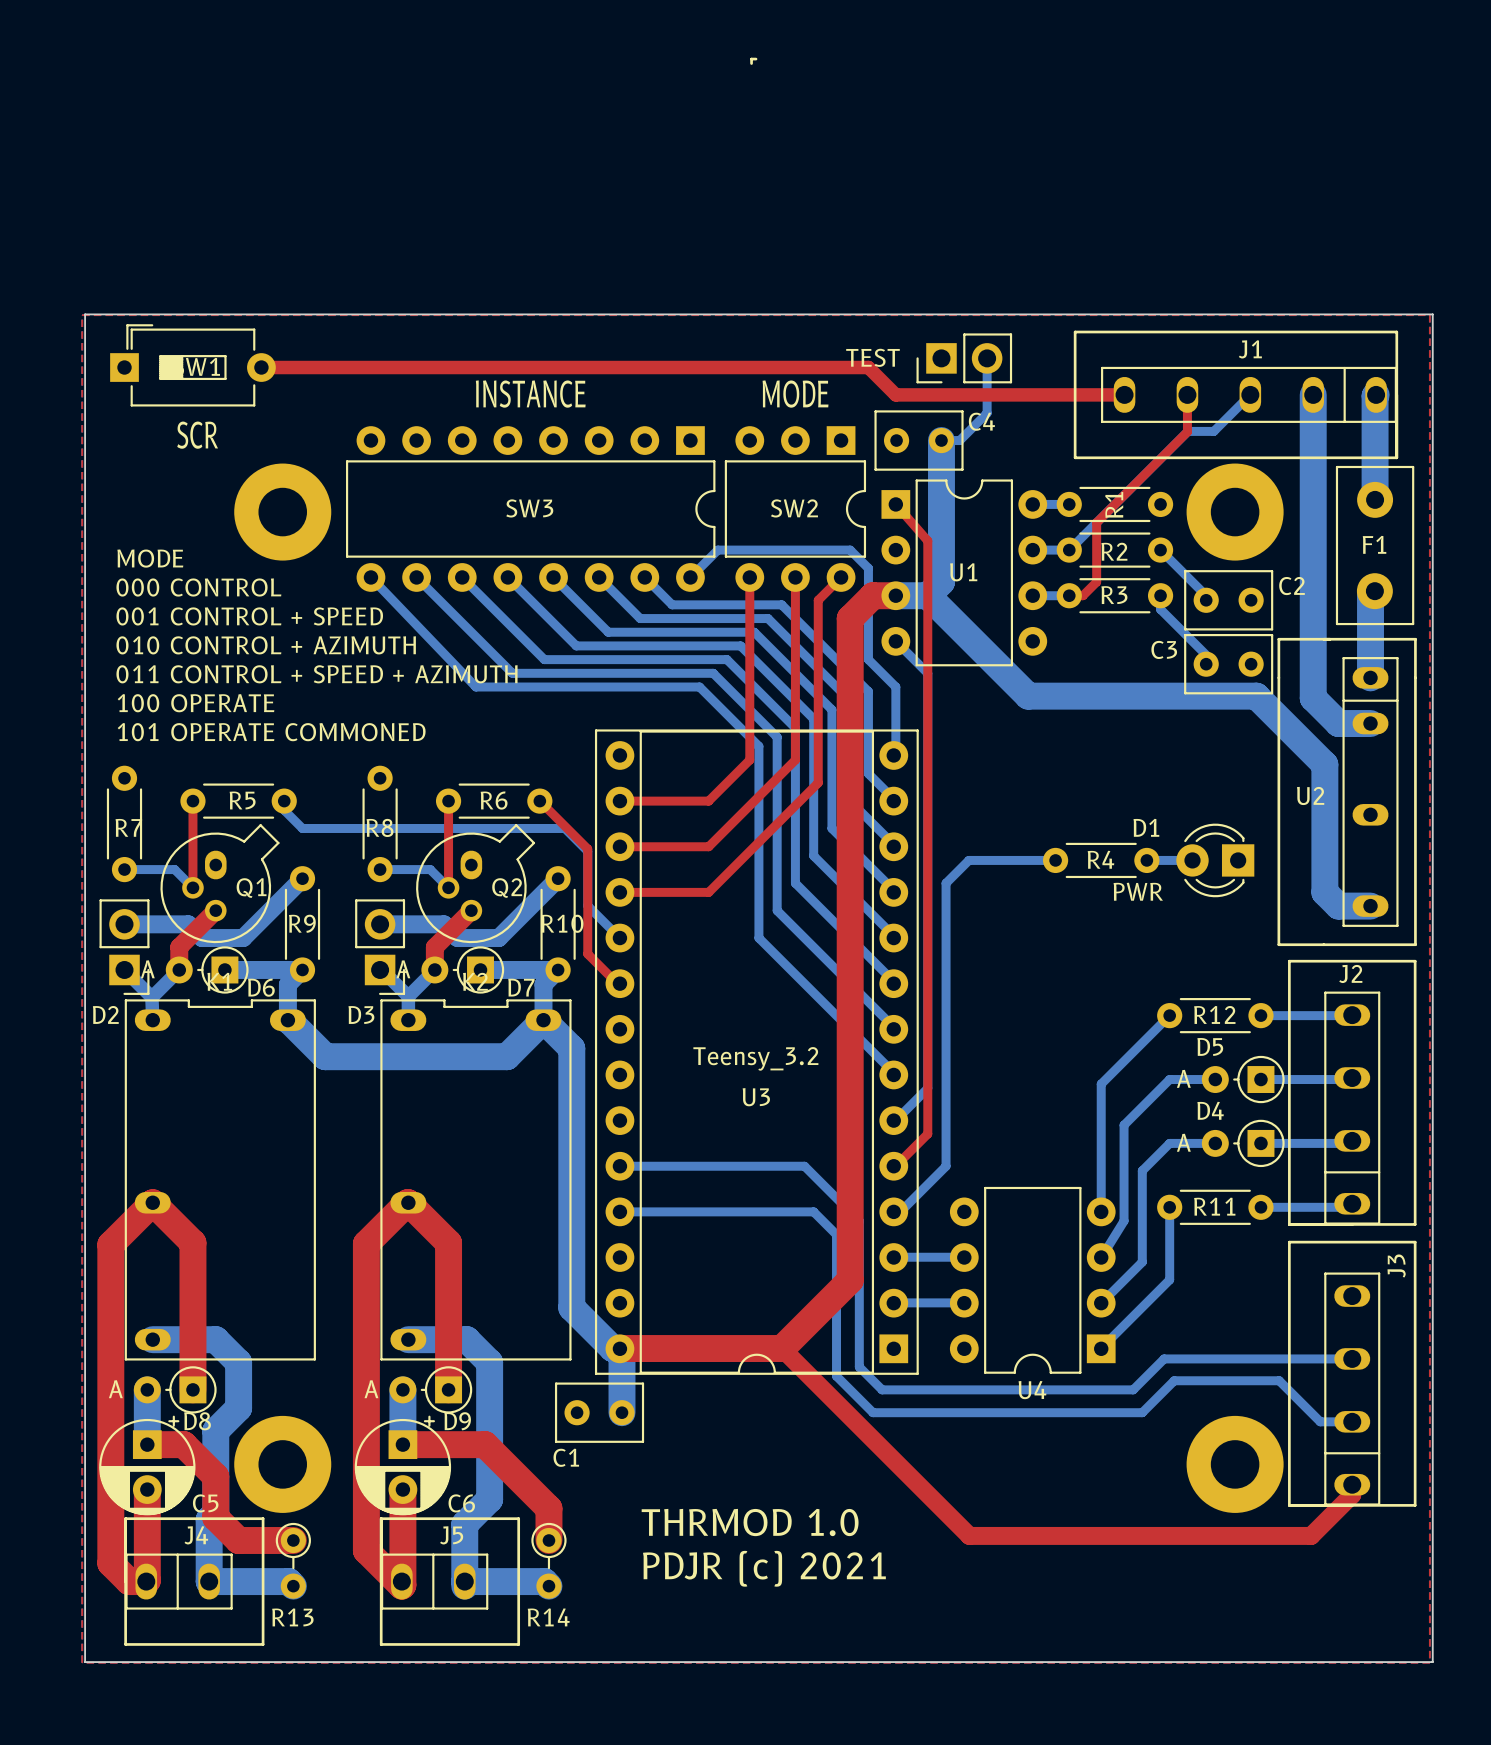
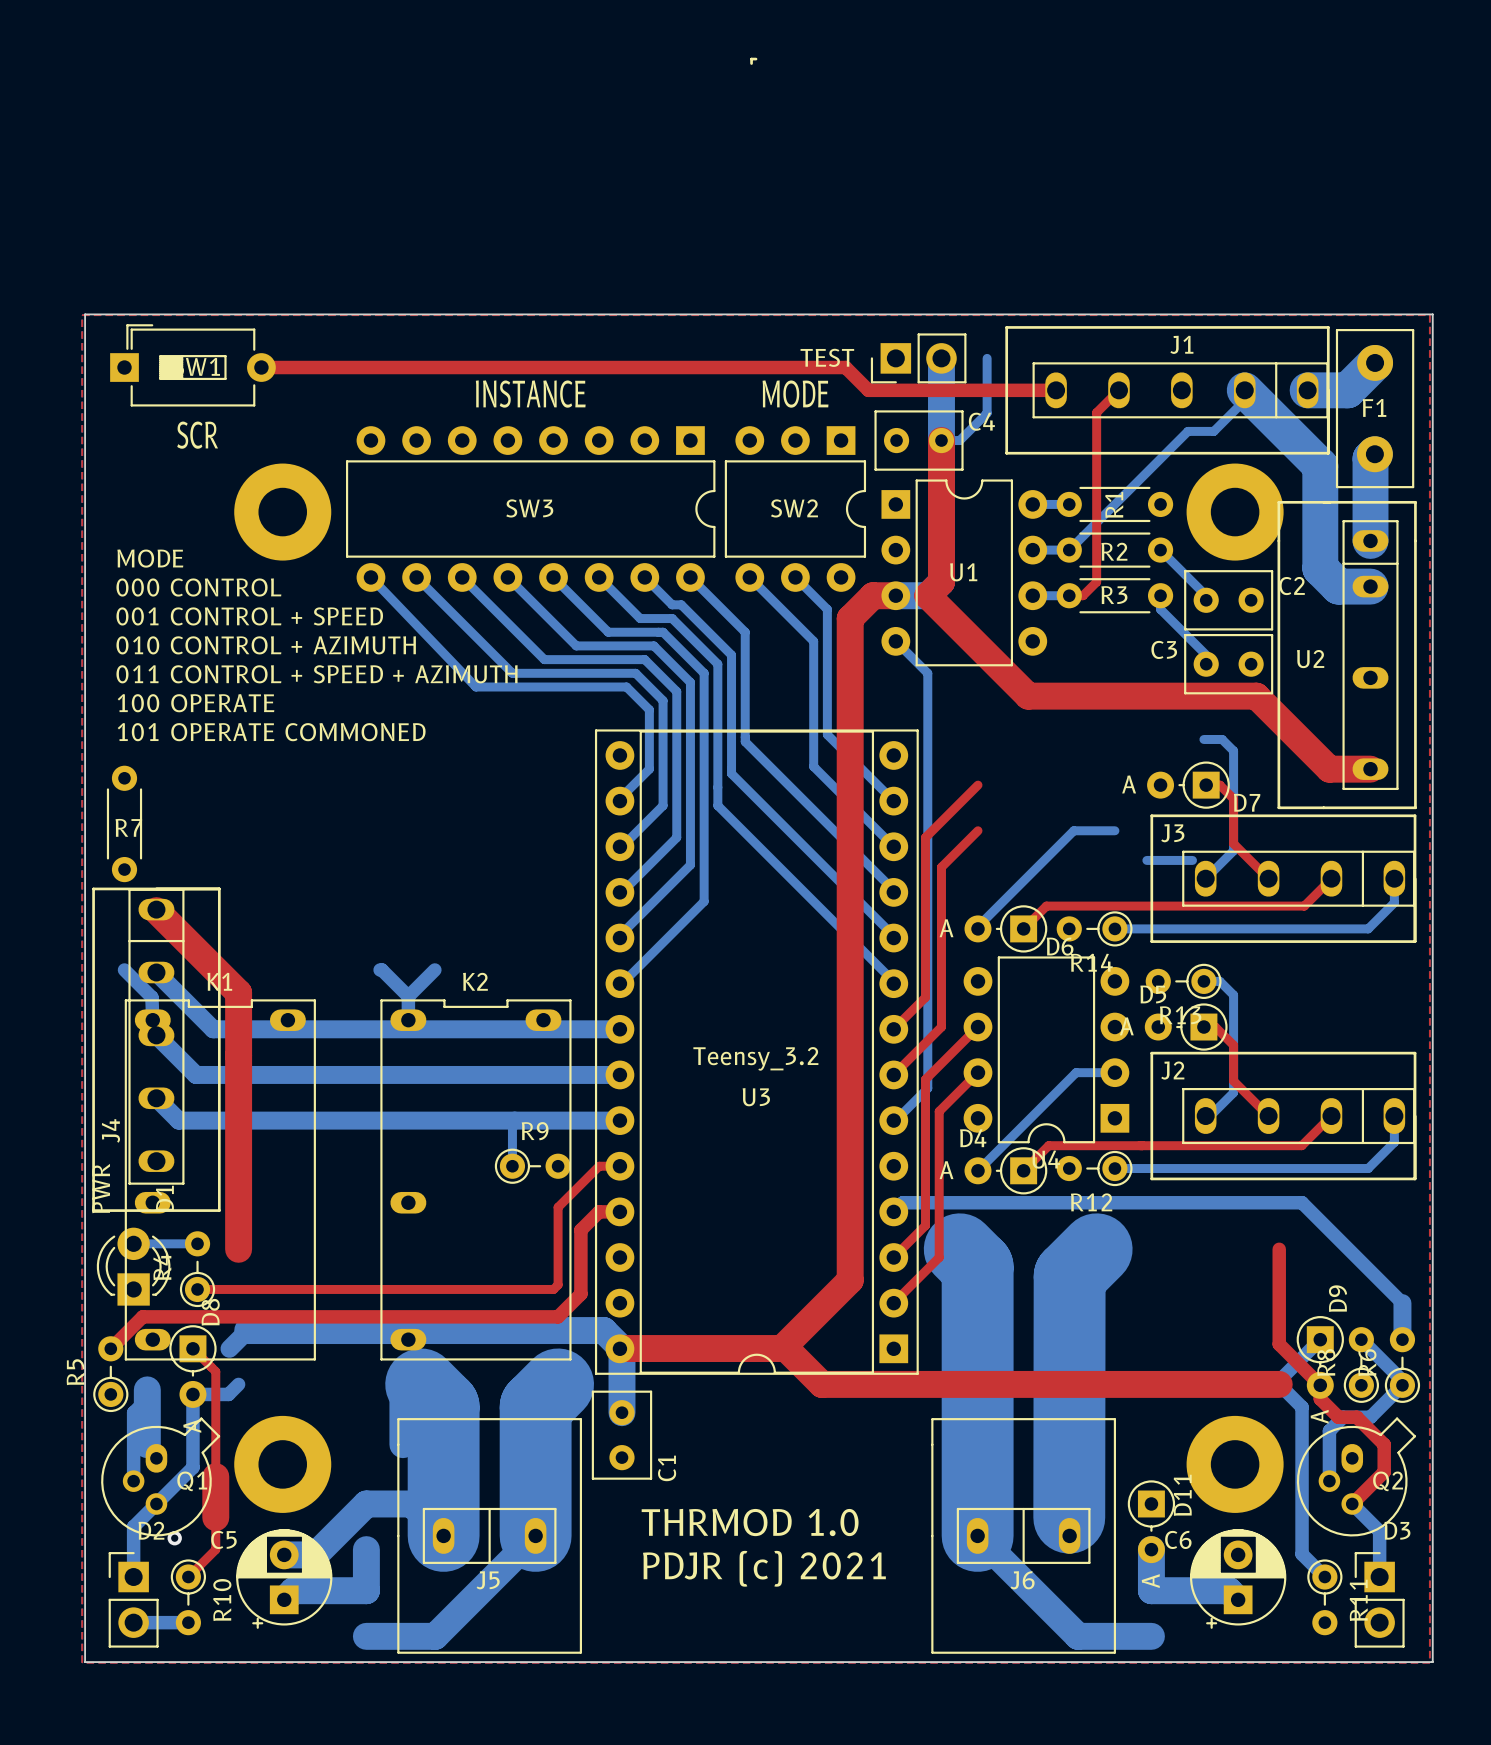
bottom track: none -> (941, 358) (941, 440)
TEST position: (964, 358) -> (918, 358)
bottom track: none -> (1375, 362) (1347, 390) (1307, 390)
top track: (845, 367) (868, 367) (895, 394) (1124, 394) -> (845, 367) (868, 390) (1056, 390)
bottom track: none -> (1244, 390) (1320, 465) (1320, 568) (1338, 586) (1370, 586)
top track: (1187, 394) (1187, 431) (1096, 522) -> (1118, 390) (1096, 412) (1096, 522)
J1 position: (1235, 394) -> (1167, 390)
bottom track: (1313, 394) (1313, 698) (1338, 723) (1370, 723) -> none
bottom track: (1376, 394) (1375, 499) -> none
top track: none -> (941, 440) (941, 582) (927, 595) (1028, 696) (1256, 696) (1329, 769) (1370, 769)
top track: (895, 504) (927, 540) (927, 1134) (895, 1165) -> none
F1 position: (1375, 545) -> (1375, 408)
bottom track: (690, 577) (717, 550) (850, 550) (868, 568) (868, 659) (895, 687) (895, 755) -> none
top track: (749, 577) (749, 760) (708, 801) (619, 801) -> none
bottom track: none -> (795, 577) (827, 609) (827, 734) (893, 801)
top track: (795, 577) (795, 760) (708, 846) (619, 846) -> none
top track: (841, 577) (818, 600) (818, 782) (708, 892) (619, 892) -> none
bottom track: (1374, 591) (1370, 595) (1370, 677) -> (1374, 454) (1370, 458) (1370, 540)
bottom track: (927, 595) (1028, 696) (1256, 696) (1324, 764) (1324, 892) (1338, 906) (1370, 906) -> none
bottom track: (681, 604) (781, 604) (868, 691) (868, 773) (895, 800) -> (681, 604) (731, 655) (731, 773) (813, 855)
bottom track: (672, 618) (768, 618) (850, 700) (850, 801) (895, 846) -> none
bottom track: (663, 632) (754, 632) (831, 709) (831, 828) -> (690, 577) (745, 632) (745, 741) (831, 828)
bottom track: none -> (663, 632) (704, 673) (704, 901) (619, 983)
bottom track: (653, 645) (740, 645) (813, 718) -> (749, 577) (813, 641) (813, 718)
bottom track: (644, 659) (726, 659) (795, 728) (795, 883) -> (672, 618) (717, 664) (717, 805) (795, 883)
bottom track: none -> (644, 659) (676, 691) (676, 837) (619, 892)
bottom track: (635, 673) (713, 673) (777, 737) (777, 910) (895, 1029) -> (635, 673) (663, 700) (663, 805) (619, 846)
bottom track: (626, 687) (699, 687) (758, 746) (758, 938) (895, 1074) -> (626, 687) (649, 709) (649, 769) (619, 798) (619, 801)
bottom track: none -> (1203, 739) (1222, 739) (1233, 750) (1233, 850) (1205, 878)
R8 footprint: [362, 765, 398, 883] -> [1343, 1327, 1379, 1403]
bottom track: (813, 766) (813, 855) -> (813, 766) (893, 846)
R5 footprint: [180, 783, 297, 819] -> [93, 1336, 129, 1413]
R6 footprint: [435, 783, 553, 819] -> [1384, 1327, 1421, 1403]
top track: none -> (977, 785) (925, 837) (925, 997) (893, 1029)
top track: none -> (1206, 785) (1219, 785) (1233, 798) (1233, 843) (1268, 878)
U2 position: (1347, 791) -> (1347, 655)
R5 name position: R5 (242, 800) -> R5 (75, 1372)
top track: (192, 801) (192, 887) -> none
bottom track: (284, 801) (284, 810) (302, 828) (564, 828) (587, 851) (587, 905) (619, 938) -> (653, 645) (690, 682) (690, 865) (619, 935) (619, 938)
top track: (448, 801) (448, 887) -> none
top track: (539, 801) (587, 849) (587, 954) (617, 983) (619, 983) -> none
top track: none -> (977, 830) (941, 867) (941, 1027) (893, 1074)
bottom track: none -> (1114, 830) (1073, 830) (977, 926) (977, 928)
R4 footprint: [1043, 842, 1160, 879] -> [179, 1231, 216, 1308]
bottom track: (1055, 860) (968, 860) (946, 883) (946, 1166) (900, 1211) (892, 1211) -> none
D1 rotation: 0° (1215, 860) -> 90° clockwise (133, 1266)
D1 position: (1215, 860) -> (133, 1266)
R9 footprint: [284, 866, 321, 983] -> [494, 1148, 571, 1184]
R10 footprint: [540, 866, 576, 983] -> [170, 1559, 207, 1636]
bottom track: (124, 869) (174, 869) (192, 887) -> none
bottom track: (380, 869) (430, 869) (448, 887) -> none
bottom track: (302, 878) (243, 938) (202, 938) (188, 924) (124, 924) -> none
bottom track: (558, 878) (498, 938) (457, 938) (443, 924) (380, 924) -> none
top track: none -> (1331, 878) (1304, 906) (1046, 906) (1023, 928)
bottom track: none -> (1394, 878) (1394, 902) (1368, 928) (1114, 928)
Q1 position: (219, 883) -> (160, 1476)
Q2 position: (475, 883) -> (1356, 1476)
top track: none -> (156, 909) (238, 992) (238, 1249)
top track: (215, 910) (179, 947) (179, 969) -> none
top track: (471, 910) (434, 947) (434, 969) -> none
D2 rotation: 0° (124, 947) -> 180° (133, 1599)
D2 position: (124, 947) -> (133, 1599)
D3 rotation: 0° (380, 947) -> 180° (1379, 1599)
D3 position: (380, 947) -> (1379, 1599)
bottom track: (179, 969) (151, 997) -> none
D6 position: (207, 969) -> (1005, 928)
bottom track: (224, 969) (302, 969) (287, 984) (287, 1020) (325, 1056) (506, 1056) (543, 1020) -> none
D7 position: (462, 969) -> (1188, 785)
bottom track: (480, 969) (558, 969) (543, 984) (543, 1020) -> none
bottom track: none -> (156, 972) (213, 1029) (619, 1029)
J2 name position: J2 (1350, 973) -> J2 (1172, 1070)
bottom track: none -> (1203, 981) (1219, 981) (1233, 995) (1233, 1092) (1205, 1120)
R12 footprint: [1157, 998, 1274, 1034] -> [1056, 1150, 1133, 1187]
bottom track: (1169, 1015) (1101, 1084) (1101, 1211) -> none
bottom track: (1352, 1015) (1260, 1015) -> none
bottom track: (543, 1020) (571, 1048) (571, 1307) (612, 1348) (621, 1348) -> none
top track: none -> (977, 1027) (925, 1079) (925, 1225) (893, 1257)
top track: none -> (1203, 1027) (1215, 1027) (1233, 1045) (1233, 1081) (1268, 1116)
bottom track: none -> (156, 1035) (196, 1074) (619, 1074)
top track: none -> (977, 1072) (939, 1111) (939, 1257) (893, 1302)
bottom track: none -> (1114, 1072) (1076, 1072) (977, 1170)
bottom track: (1352, 1078) (1260, 1079) -> none
bottom track: (1215, 1079) (1169, 1079) (1124, 1125) (1124, 1221) (1101, 1257) -> none
D5 position: (1243, 1079) -> (1186, 1027)
J2 rotation: 0° (1352, 1092) -> 90° counterclockwise (1283, 1116)
bottom track: none -> (156, 1098) (178, 1120) (619, 1120)
top track: none -> (1331, 1116) (1301, 1145) (1048, 1145) (1023, 1170)
bottom track: none -> (514, 1120) (512, 1122) (512, 1166)
bottom track: none -> (1394, 1120) (1394, 1142) (1368, 1168) (1114, 1168)
bottom track: (1352, 1140) (1349, 1143) (1260, 1143) -> none
bottom track: (1215, 1143) (1169, 1143) (1142, 1170) (1142, 1262) (1101, 1302) -> none
D4 position: (1243, 1143) -> (1005, 1170)
bottom track: (619, 1166) (804, 1166) (859, 1221) (859, 1367) (882, 1389) (1133, 1389) (1164, 1358) (1352, 1358) -> none
top track: none -> (619, 1166) (599, 1166) (558, 1207) (558, 1284) (553, 1289) (197, 1289)
R11 footprint: [1157, 1189, 1274, 1225] -> [1307, 1559, 1343, 1636]
bottom track: (1352, 1203) (1348, 1207) (1260, 1207) -> none
bottom track: (1169, 1207) (1169, 1279) (1101, 1348) -> none
bottom track: (619, 1211) (813, 1211) (836, 1234) (836, 1376) (873, 1412) (1142, 1412) (1174, 1380) (1279, 1380) (1320, 1421) (1352, 1421) -> none
top track: none -> (619, 1211) (599, 1211) (580, 1230) (580, 1294) (558, 1316) (142, 1316) (110, 1348)
bottom track: none -> (895, 1211) (893, 1211) (902, 1202) (1302, 1202) (1402, 1303) (1402, 1339)
bottom track: none -> (133, 1243) (197, 1243)
bottom track: none -> (959, 1249) (977, 1267) (977, 1535) (1078, 1636) (1151, 1636)
bottom track: none -> (1096, 1249) (1069, 1276) (1069, 1517)
top track: none -> (1279, 1249) (1279, 1344) (1320, 1385) (1320, 1399) (1338, 1417) (1356, 1417) (1384, 1444) (1384, 1472) (1352, 1503)
bottom track: (892, 1257) (964, 1257) -> none
U4 position: (1032, 1280) -> (1046, 1049)
bottom track: (892, 1302) (964, 1302) -> none
bottom track: (152, 1339) (215, 1339) (238, 1362) (238, 1408) (215, 1430) (215, 1513) -> none
bottom track: (408, 1339) (466, 1339) (489, 1362) (489, 1499) (464, 1524) (464, 1586) -> none
bottom track: none -> (1320, 1339) (1279, 1380) (1279, 1384) (1302, 1407) (1302, 1554) (1324, 1577)
bottom track: none -> (1361, 1339) (1402, 1380) (1402, 1385) (1370, 1417) (1343, 1417) (1329, 1430) (1329, 1481)
bottom track: none -> (229, 1348) (247, 1330) (603, 1330) (619, 1348)
top track: none -> (619, 1348) (786, 1348) (821, 1384) (1279, 1384)
top track: (782, 1348) (969, 1535) (1311, 1535) (1352, 1494) (1352, 1484) -> none
J3 rotation: 0° (1352, 1373) -> 90° counterclockwise (1283, 878)
J3 position: (1352, 1373) -> (1283, 878)
bottom track: none -> (238, 1384) (228, 1394) (192, 1394) (192, 1467) (133, 1526) (133, 1577)
bottom track: none -> (421, 1384) (443, 1406) (443, 1535) (411, 1503) (366, 1503) (315, 1554) (284, 1554)
bottom track: none -> (558, 1384) (535, 1406) (535, 1535) (435, 1636) (366, 1636)
D8 rotation: 0° (175, 1389) -> 90° counterclockwise (192, 1366)
top track: (192, 1389) (192, 1242) (152, 1202) (110, 1244) (110, 1563) (129, 1581) (137, 1581) -> none
D9 rotation: 0° (430, 1389) -> 90° counterclockwise (1320, 1357)
D9 position: (430, 1389) -> (1320, 1357)
top track: (448, 1389) (448, 1242) (407, 1202) (366, 1243) (366, 1550) (401, 1586) (402, 1489) -> none
bottom track: none -> (151, 1394) (133, 1412) (133, 1481)
C1 rotation: 0° (599, 1412) -> 90° clockwise (621, 1435)
top track: (147, 1444) (183, 1444) (215, 1476) -> (192, 1348) (215, 1371) (215, 1476)
top track: (402, 1444) (485, 1444) (548, 1508) (548, 1540) -> none
C1 name position: C1 (566, 1457) -> C1 (667, 1468)
C5 rotation: 0° (147, 1465) -> 180° (284, 1579)
C5 position: (147, 1465) -> (284, 1579)
C6 rotation: 0° (402, 1465) -> 180° (1238, 1579)
C6 position: (402, 1465) -> (1238, 1579)
top track: (147, 1489) (146, 1581) -> none
bottom track: none -> (1352, 1503) (1379, 1531) (1379, 1577)
bottom track: (215, 1513) (209, 1519) (209, 1581) (288, 1581) (293, 1586) -> none
J4 footprint: [124, 1517, 265, 1646] -> [92, 887, 221, 1212]
top track: (215, 1517) (238, 1540) (293, 1540) -> (215, 1517) (215, 1549) (188, 1577)
J5 footprint: [379, 1517, 521, 1646] -> [397, 1418, 582, 1654]
D11: none -> (1151, 1521)
J4 name position: J4 (196, 1535) -> J4 (110, 1130)
J5 name position: J5 (451, 1535) -> J5 (488, 1580)
J6: none -> (1023, 1535)
via: none -> (174, 1538)
bottom track: none -> (366, 1549) (366, 1590) (293, 1590) (284, 1599)
bottom track: none -> (1151, 1549) (1151, 1590) (1229, 1590) (1238, 1599)
R13 rotation: 0° (293, 1560) -> 90° clockwise (1183, 981)
R13 position: (293, 1560) -> (1183, 981)
R14 rotation: 0° (548, 1560) -> 90° clockwise (1094, 928)
R14 position: (548, 1560) -> (1094, 928)
bottom track: (464, 1581) (544, 1581) (548, 1586) -> none
bottom track: none -> (133, 1622) (188, 1622)

